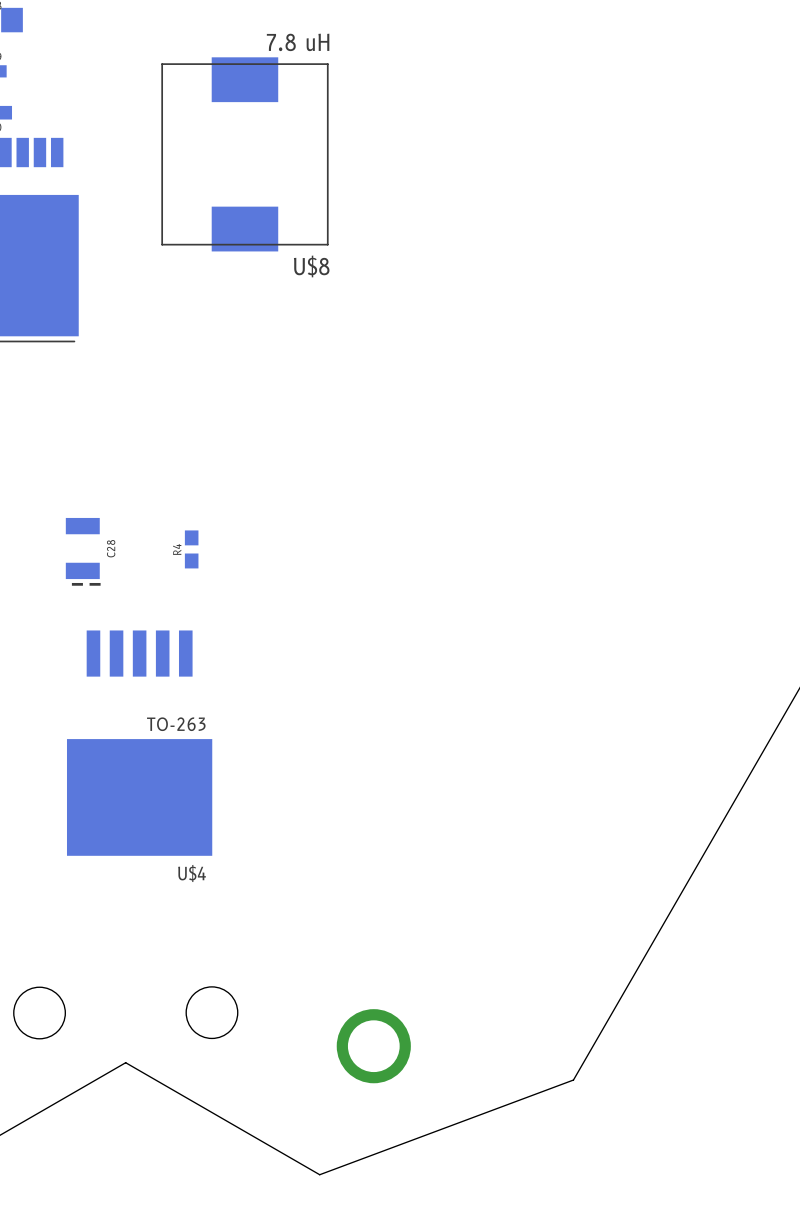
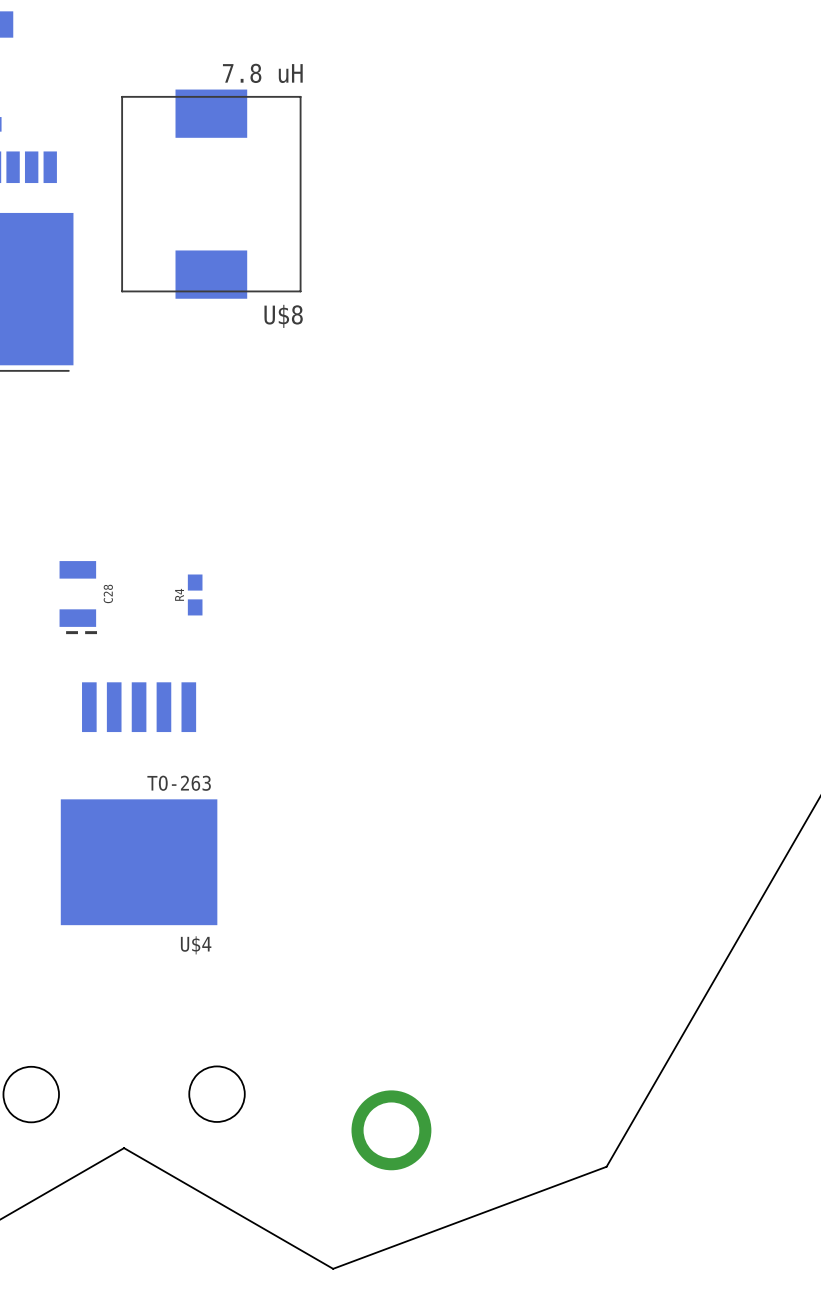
U$8 position: (244, 154) -> (211, 194)

